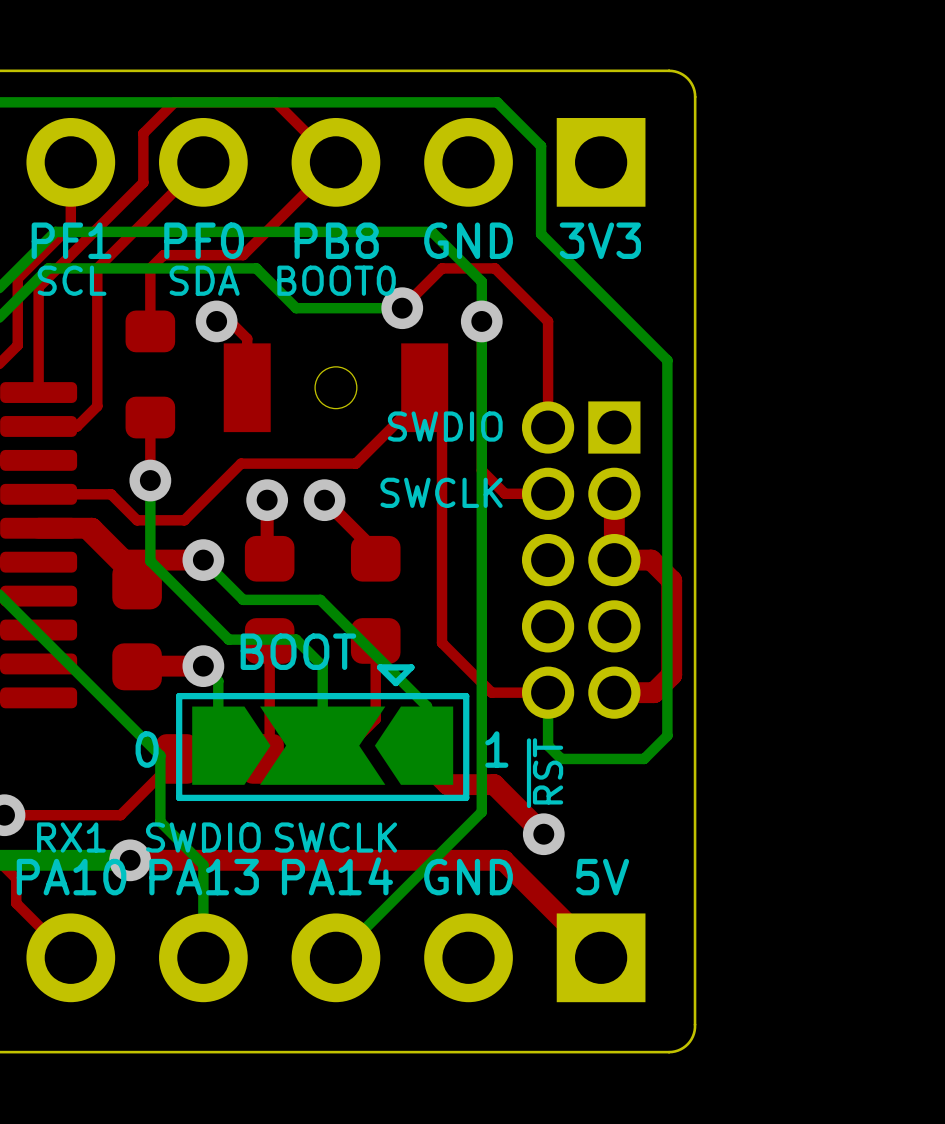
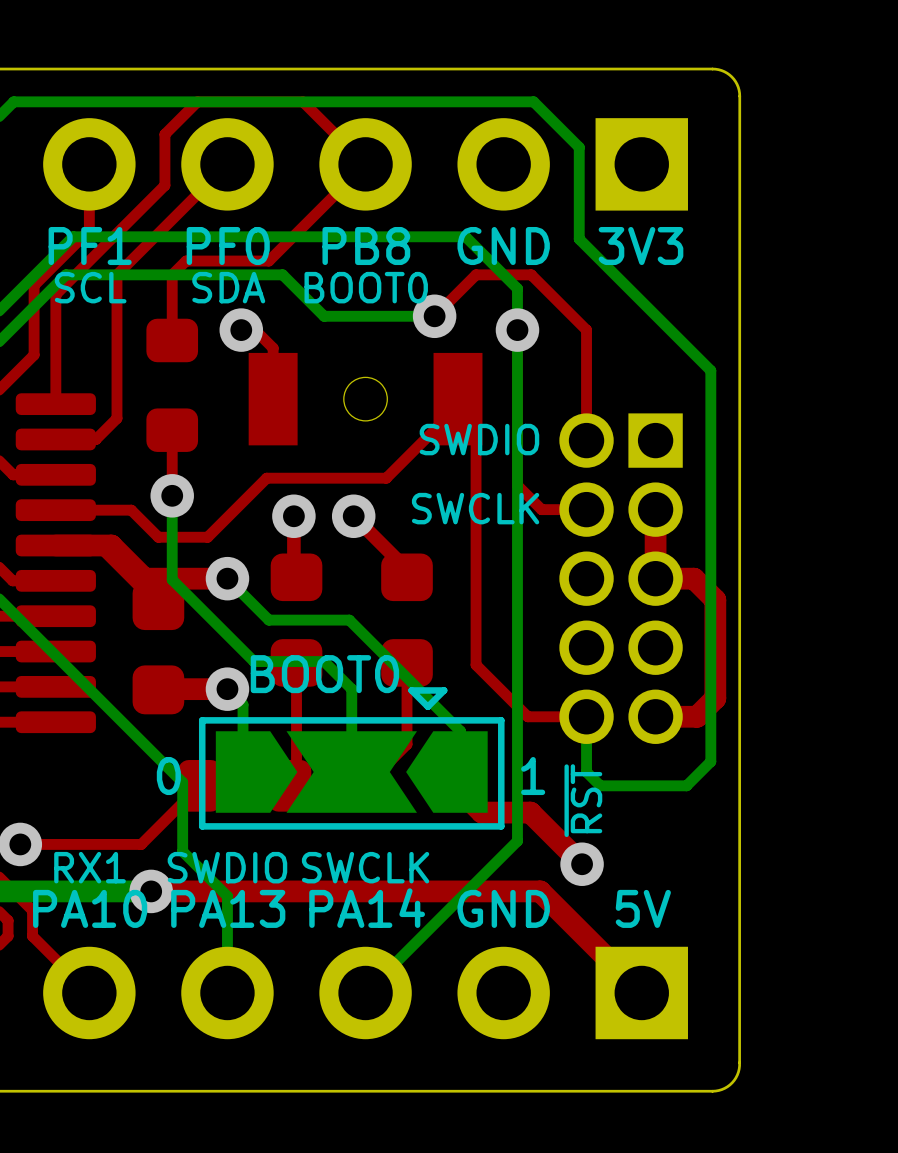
text: BOOT (298, 651) -> BOOT0 (324, 674)

